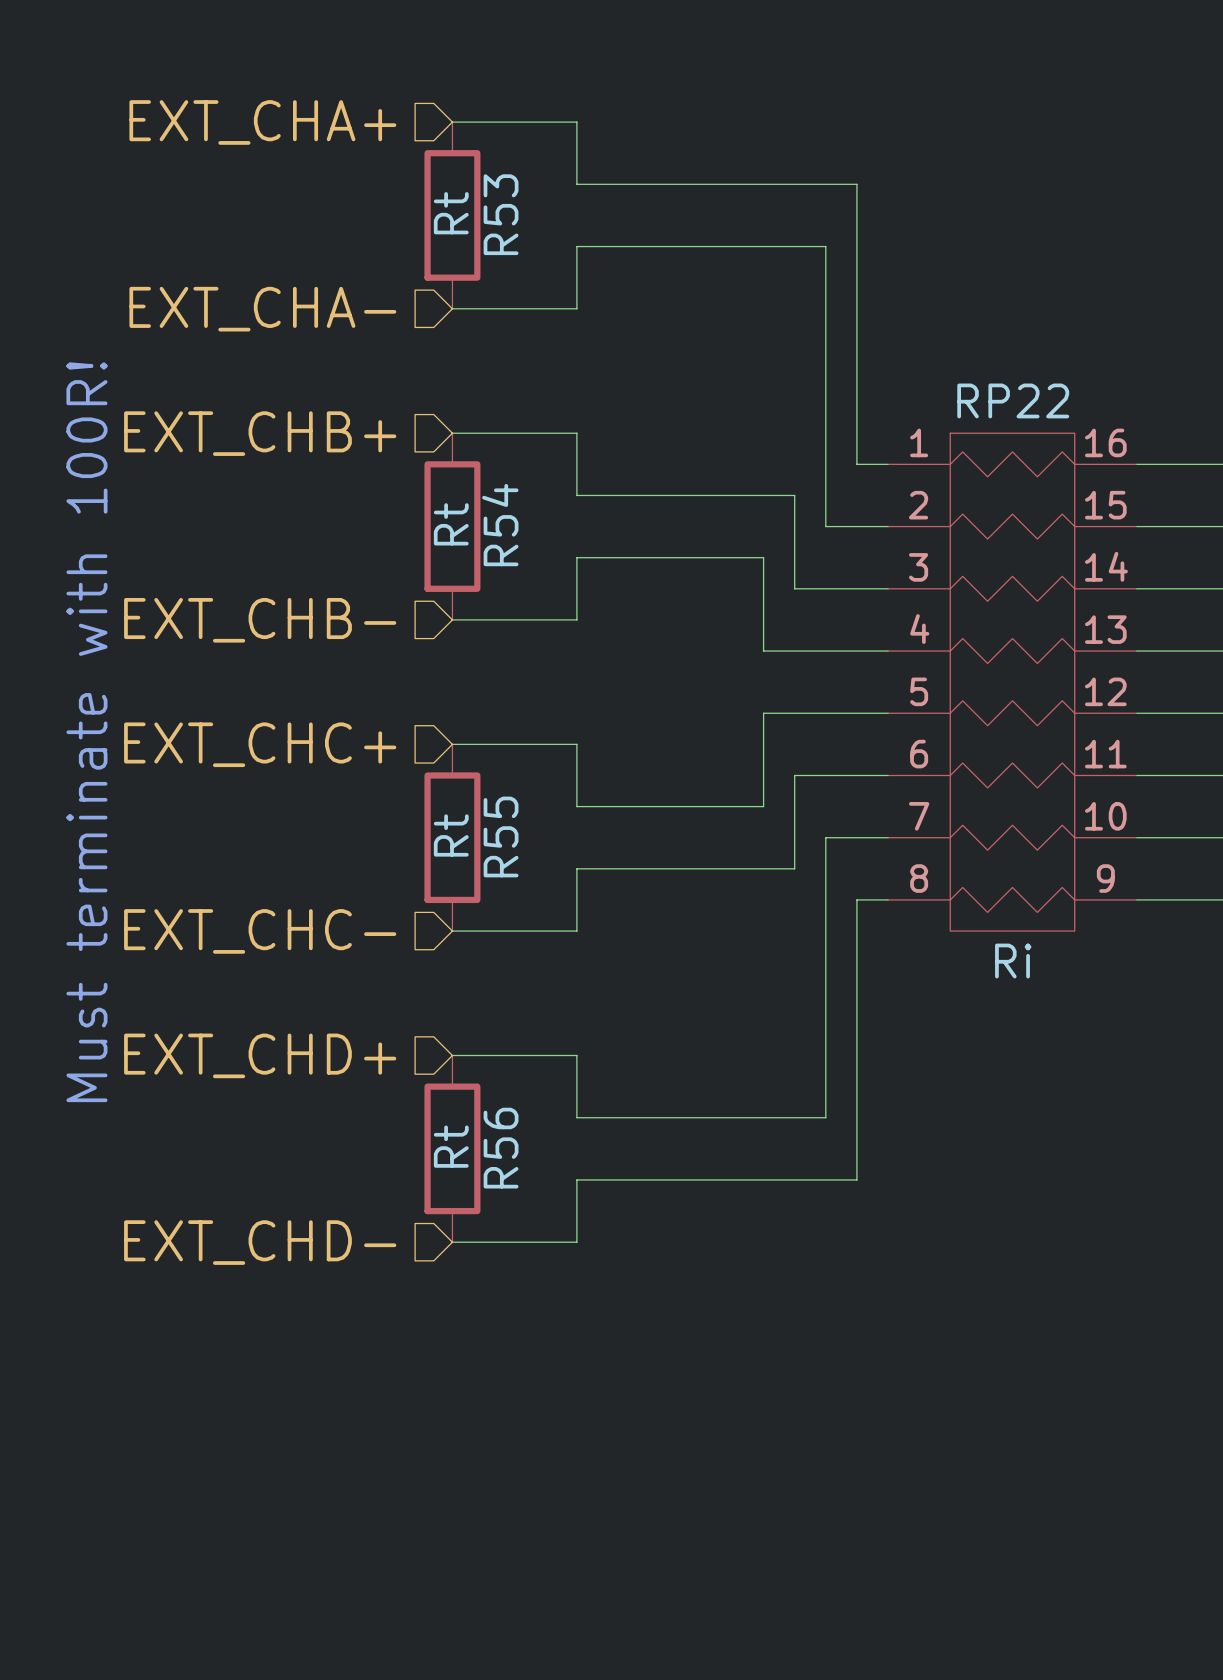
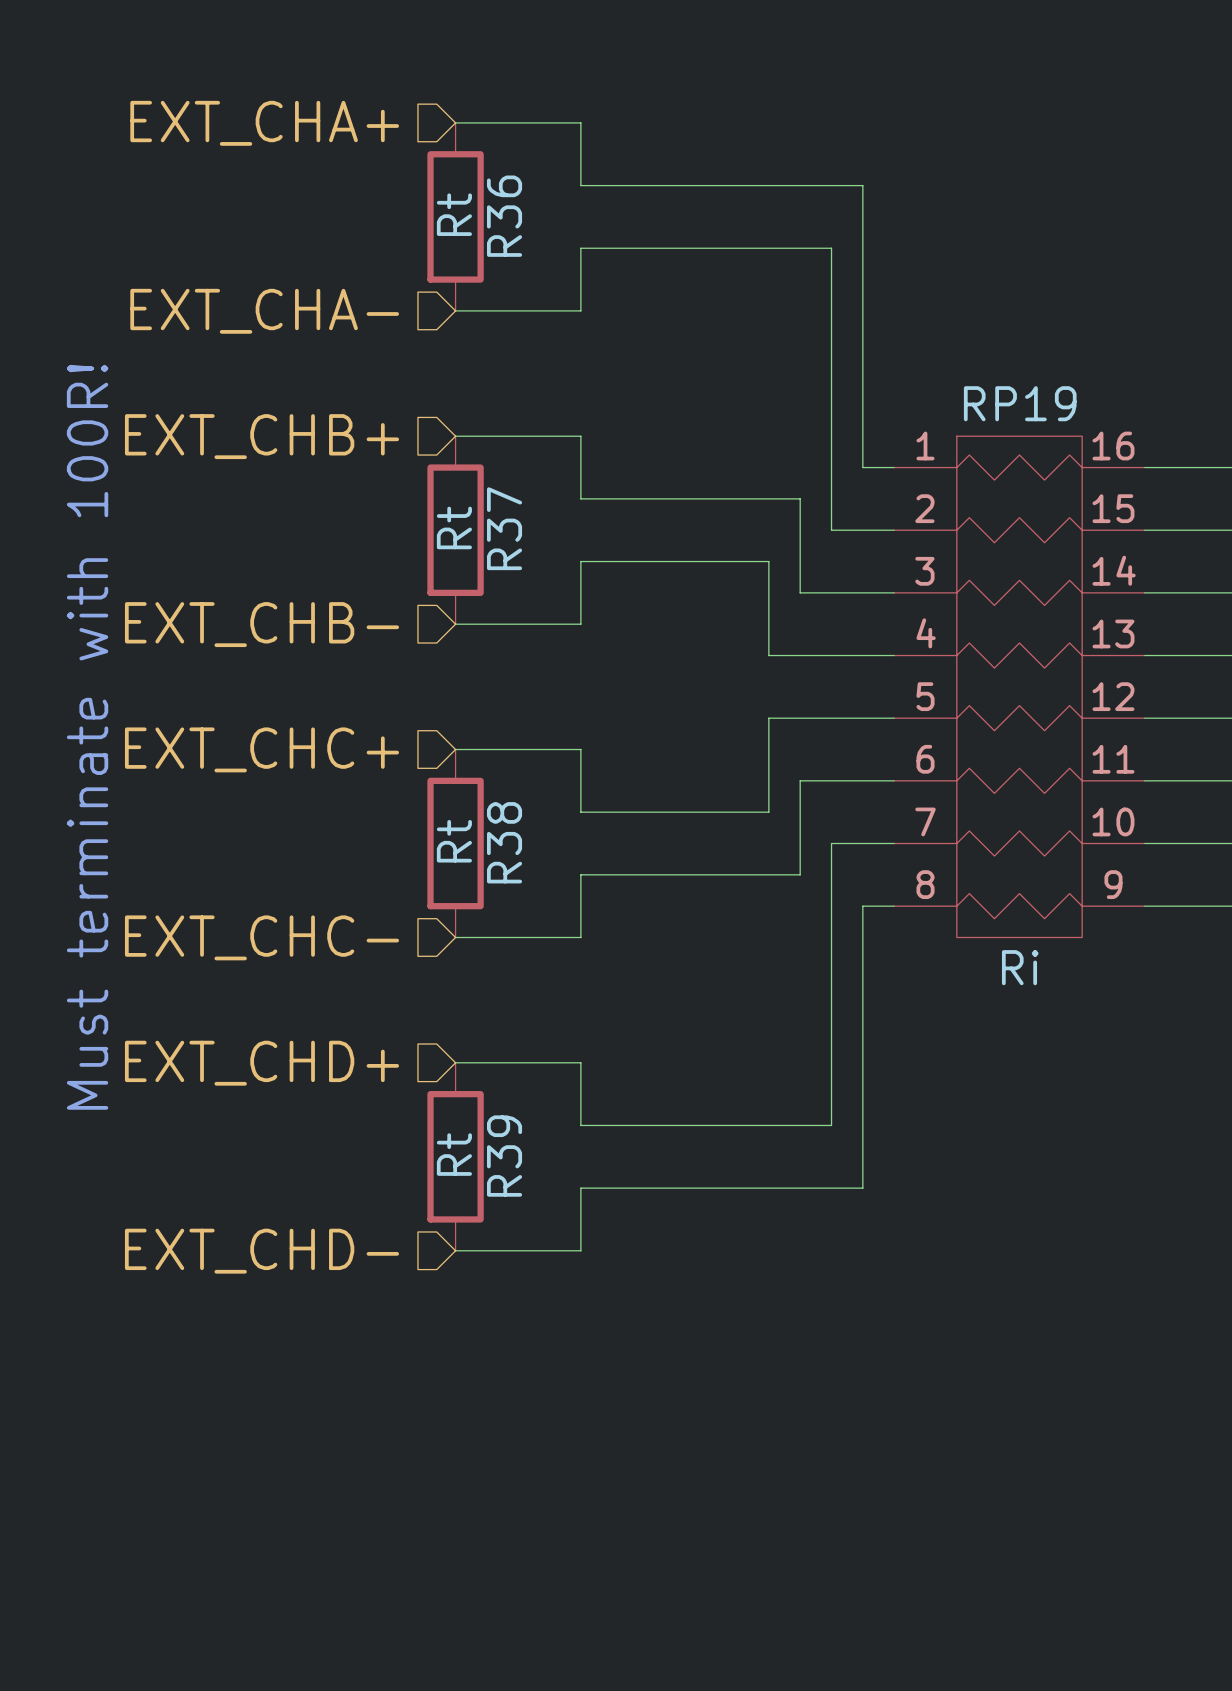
R53 name: R53 (501, 214) -> R36 (504, 216)
RP22 name: RP22 (1013, 400) -> RP19 (1020, 403)
R54 name: R54 (500, 525) -> R37 (504, 528)
R55 name: R55 (501, 836) -> R38 (504, 842)
R56 name: R56 (501, 1148) -> R39 (504, 1156)

